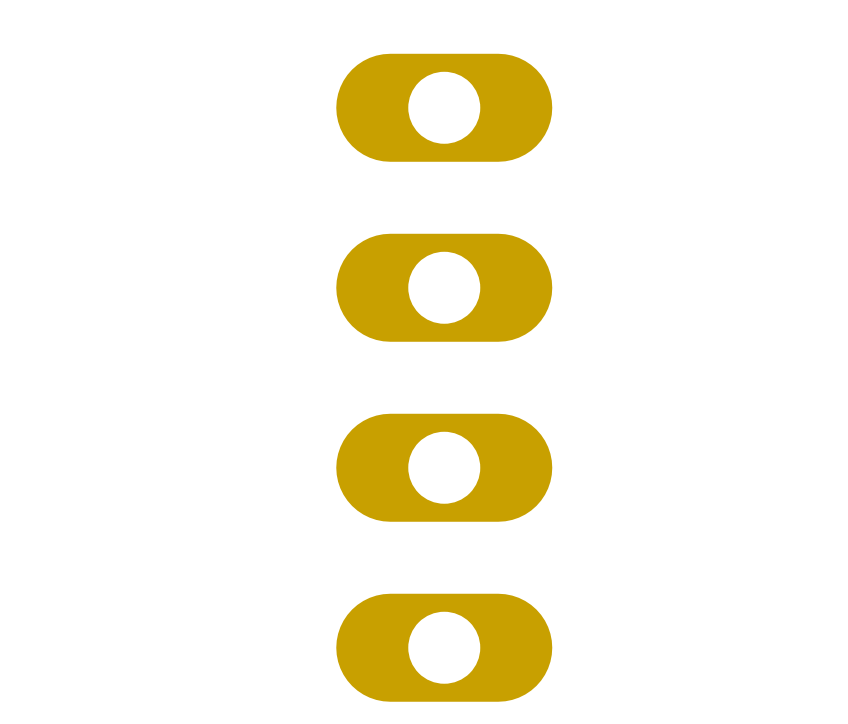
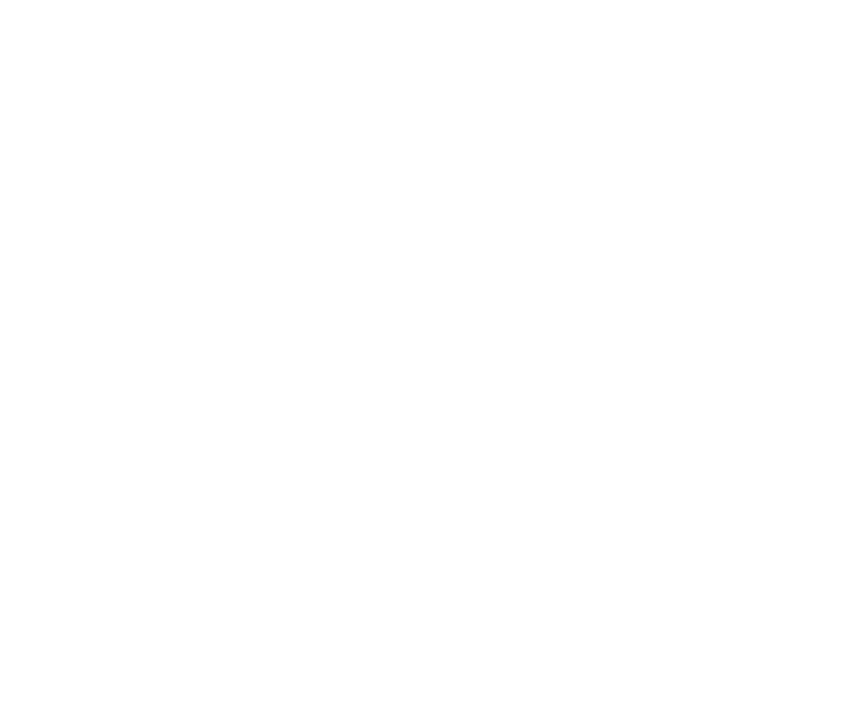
part: (444, 377) -> none

